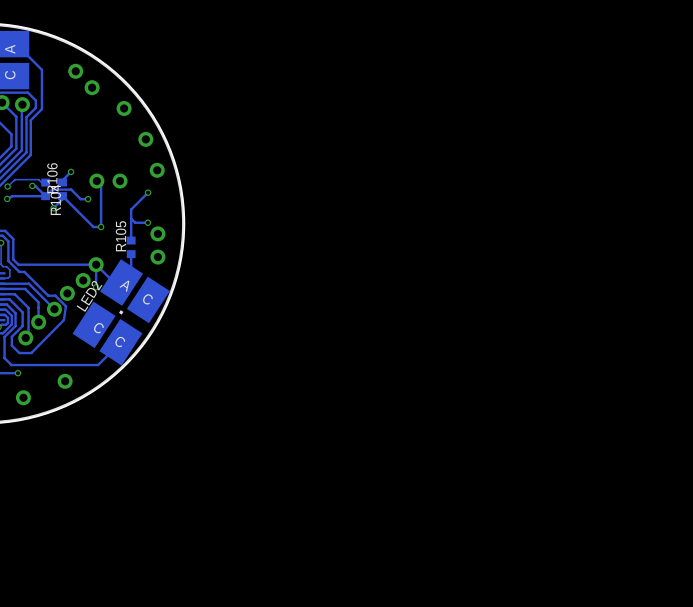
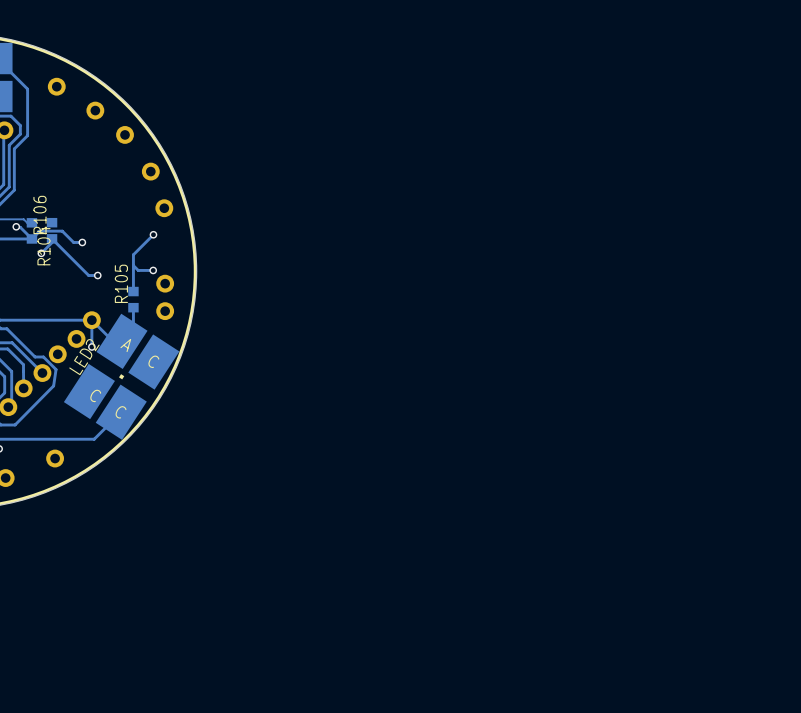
part: none -> (56, 86)
part: (83, 79) -> none
part: none -> (95, 110)
track: (71, 171) (62, 182) -> none
via: (71, 171) -> none
track: (96, 181) (101, 185) (101, 227) -> none
part: (108, 181) -> none

